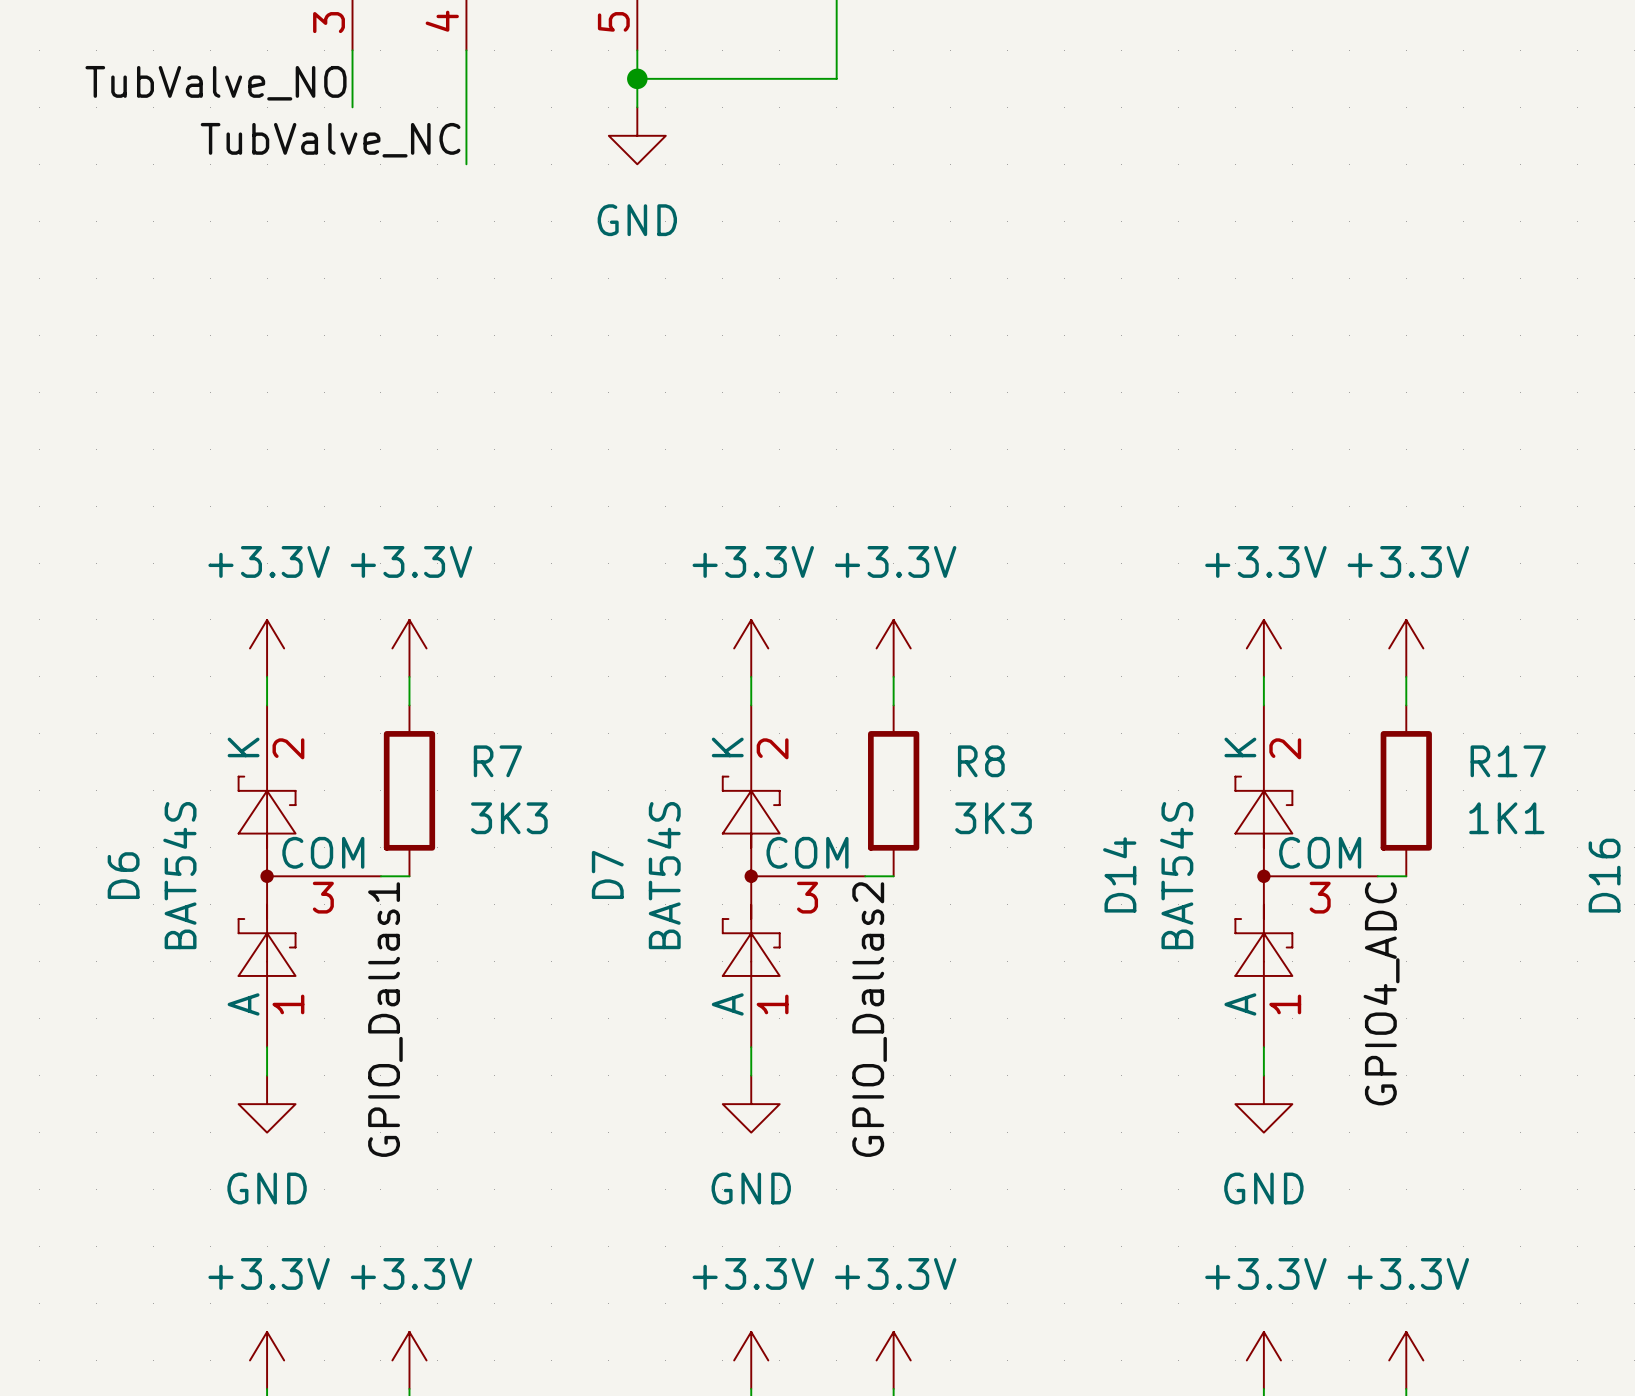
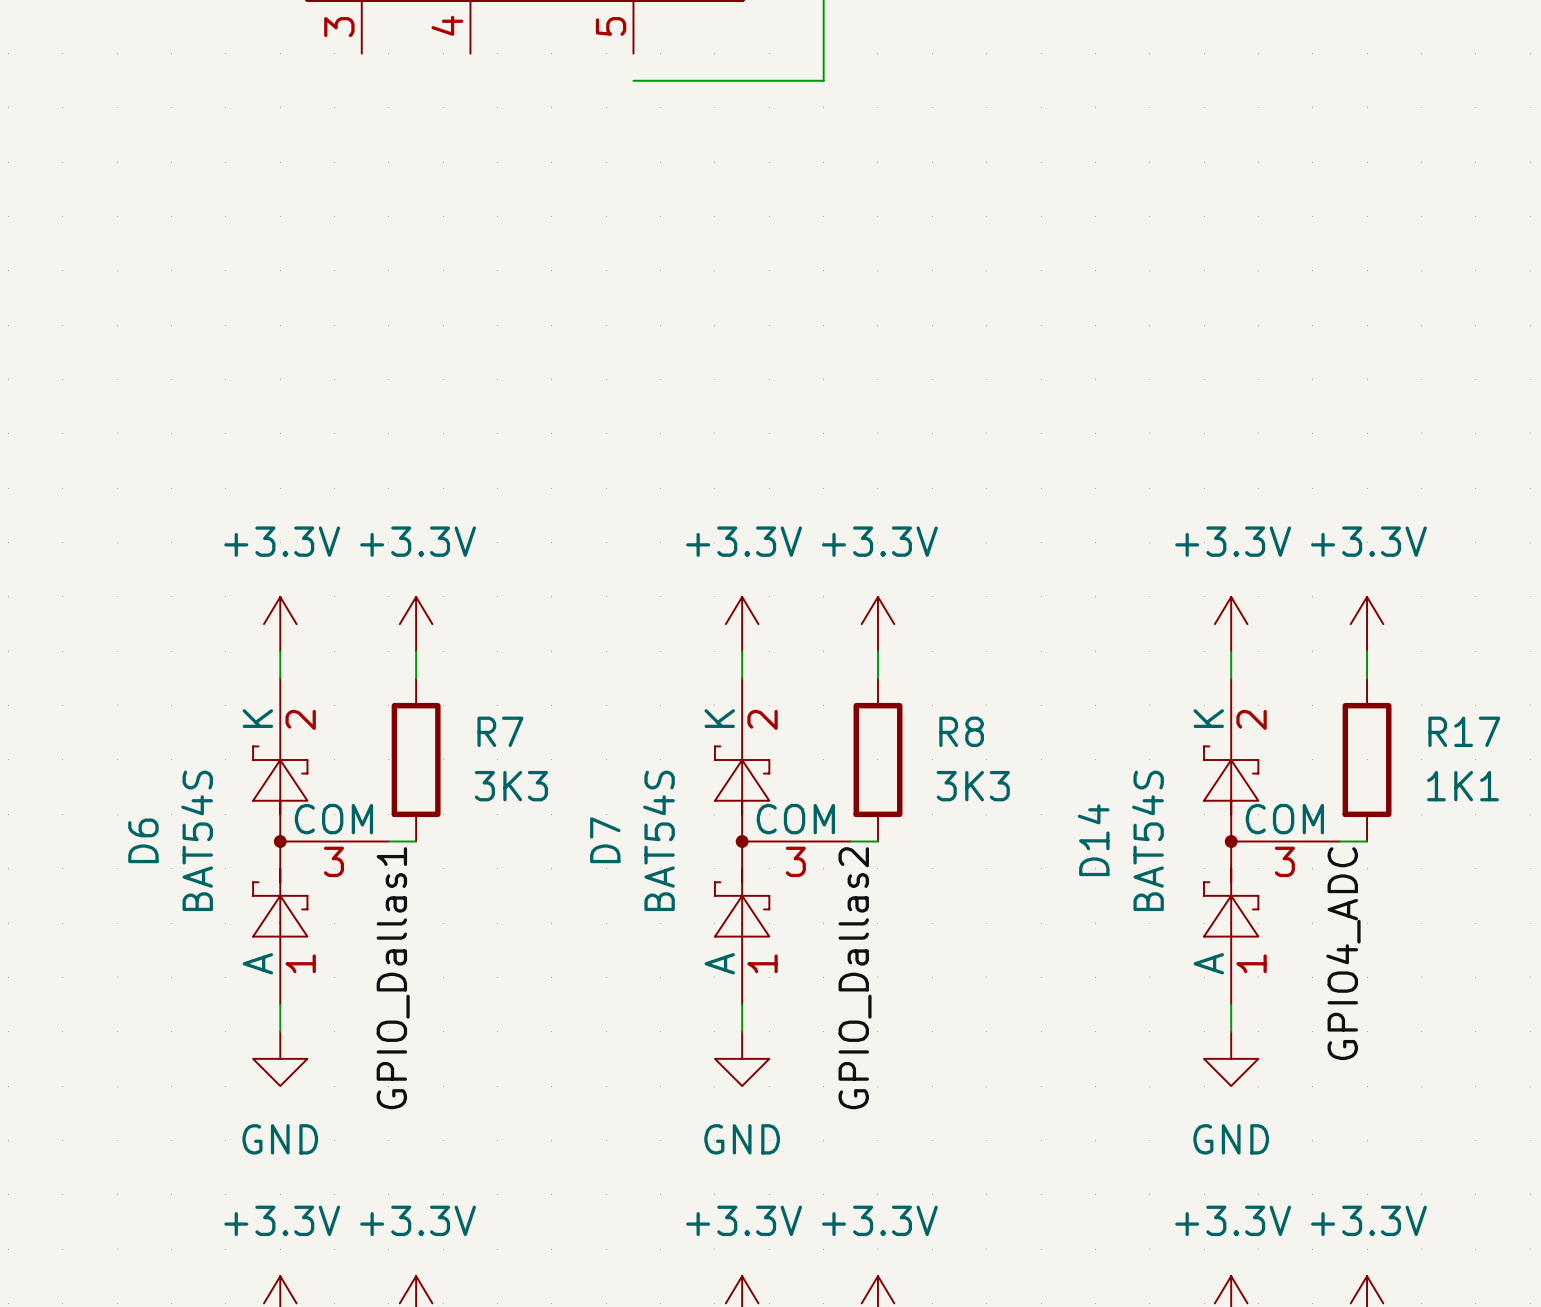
wire: (352, 50) (352, 107) -> none
wire: (466, 50) (466, 164) -> none
wire: (637, 50) (637, 107) -> none
junction: (637, 78) -> none
label: TubValve_NO (216, 83) -> none
power symbol: GND (637, 135) -> none
label: TubValve_NC (330, 140) -> none

